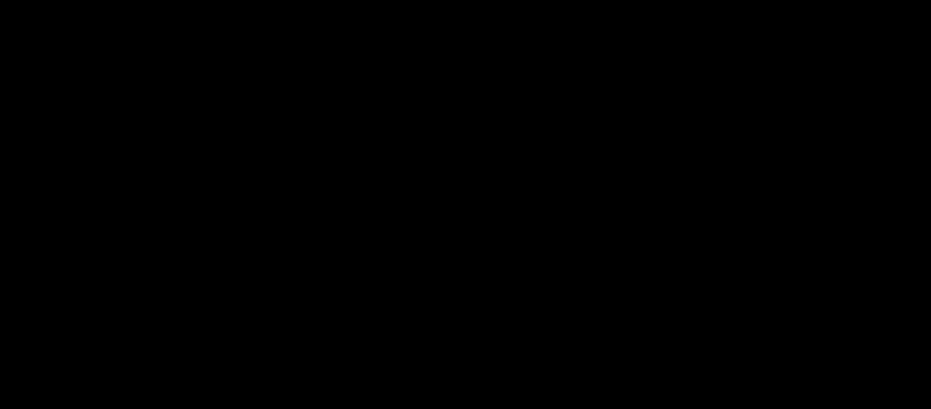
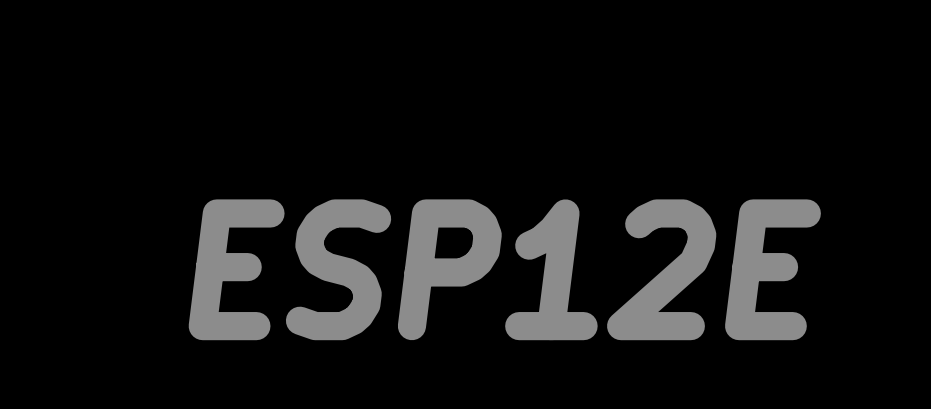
text: none -> ESP12E (504, 269)

